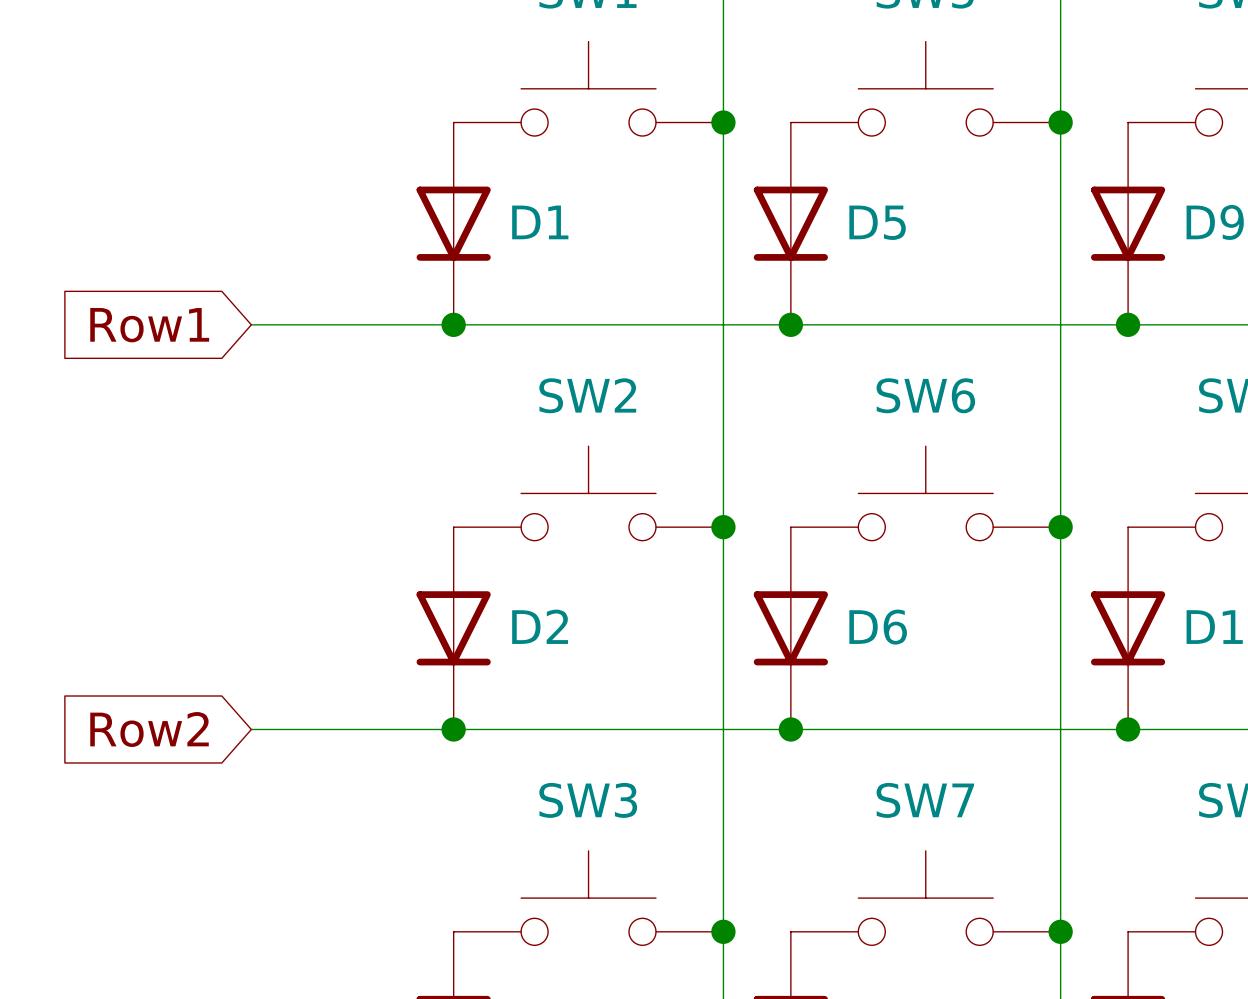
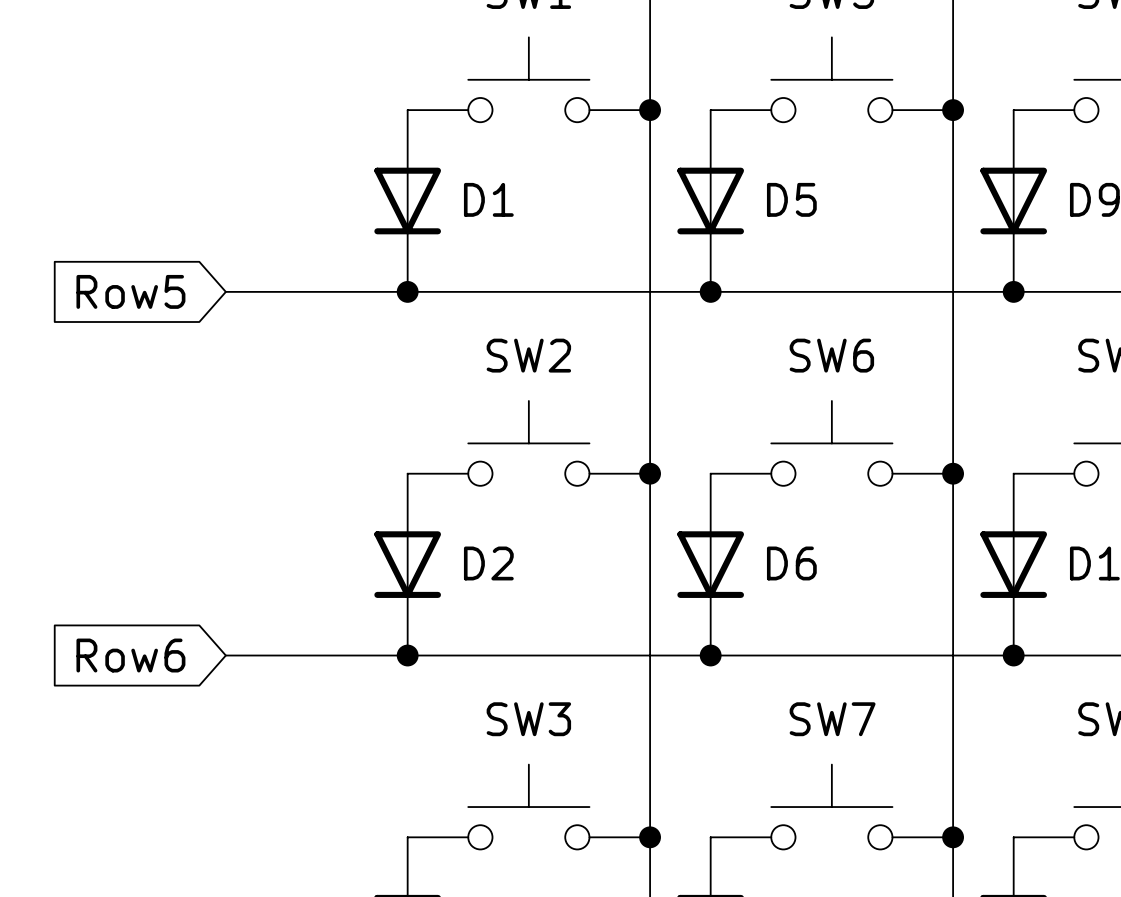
global label: Row1 (149, 325) -> Row5 (130, 291)
global label: Row2 (149, 729) -> Row6 (130, 655)

